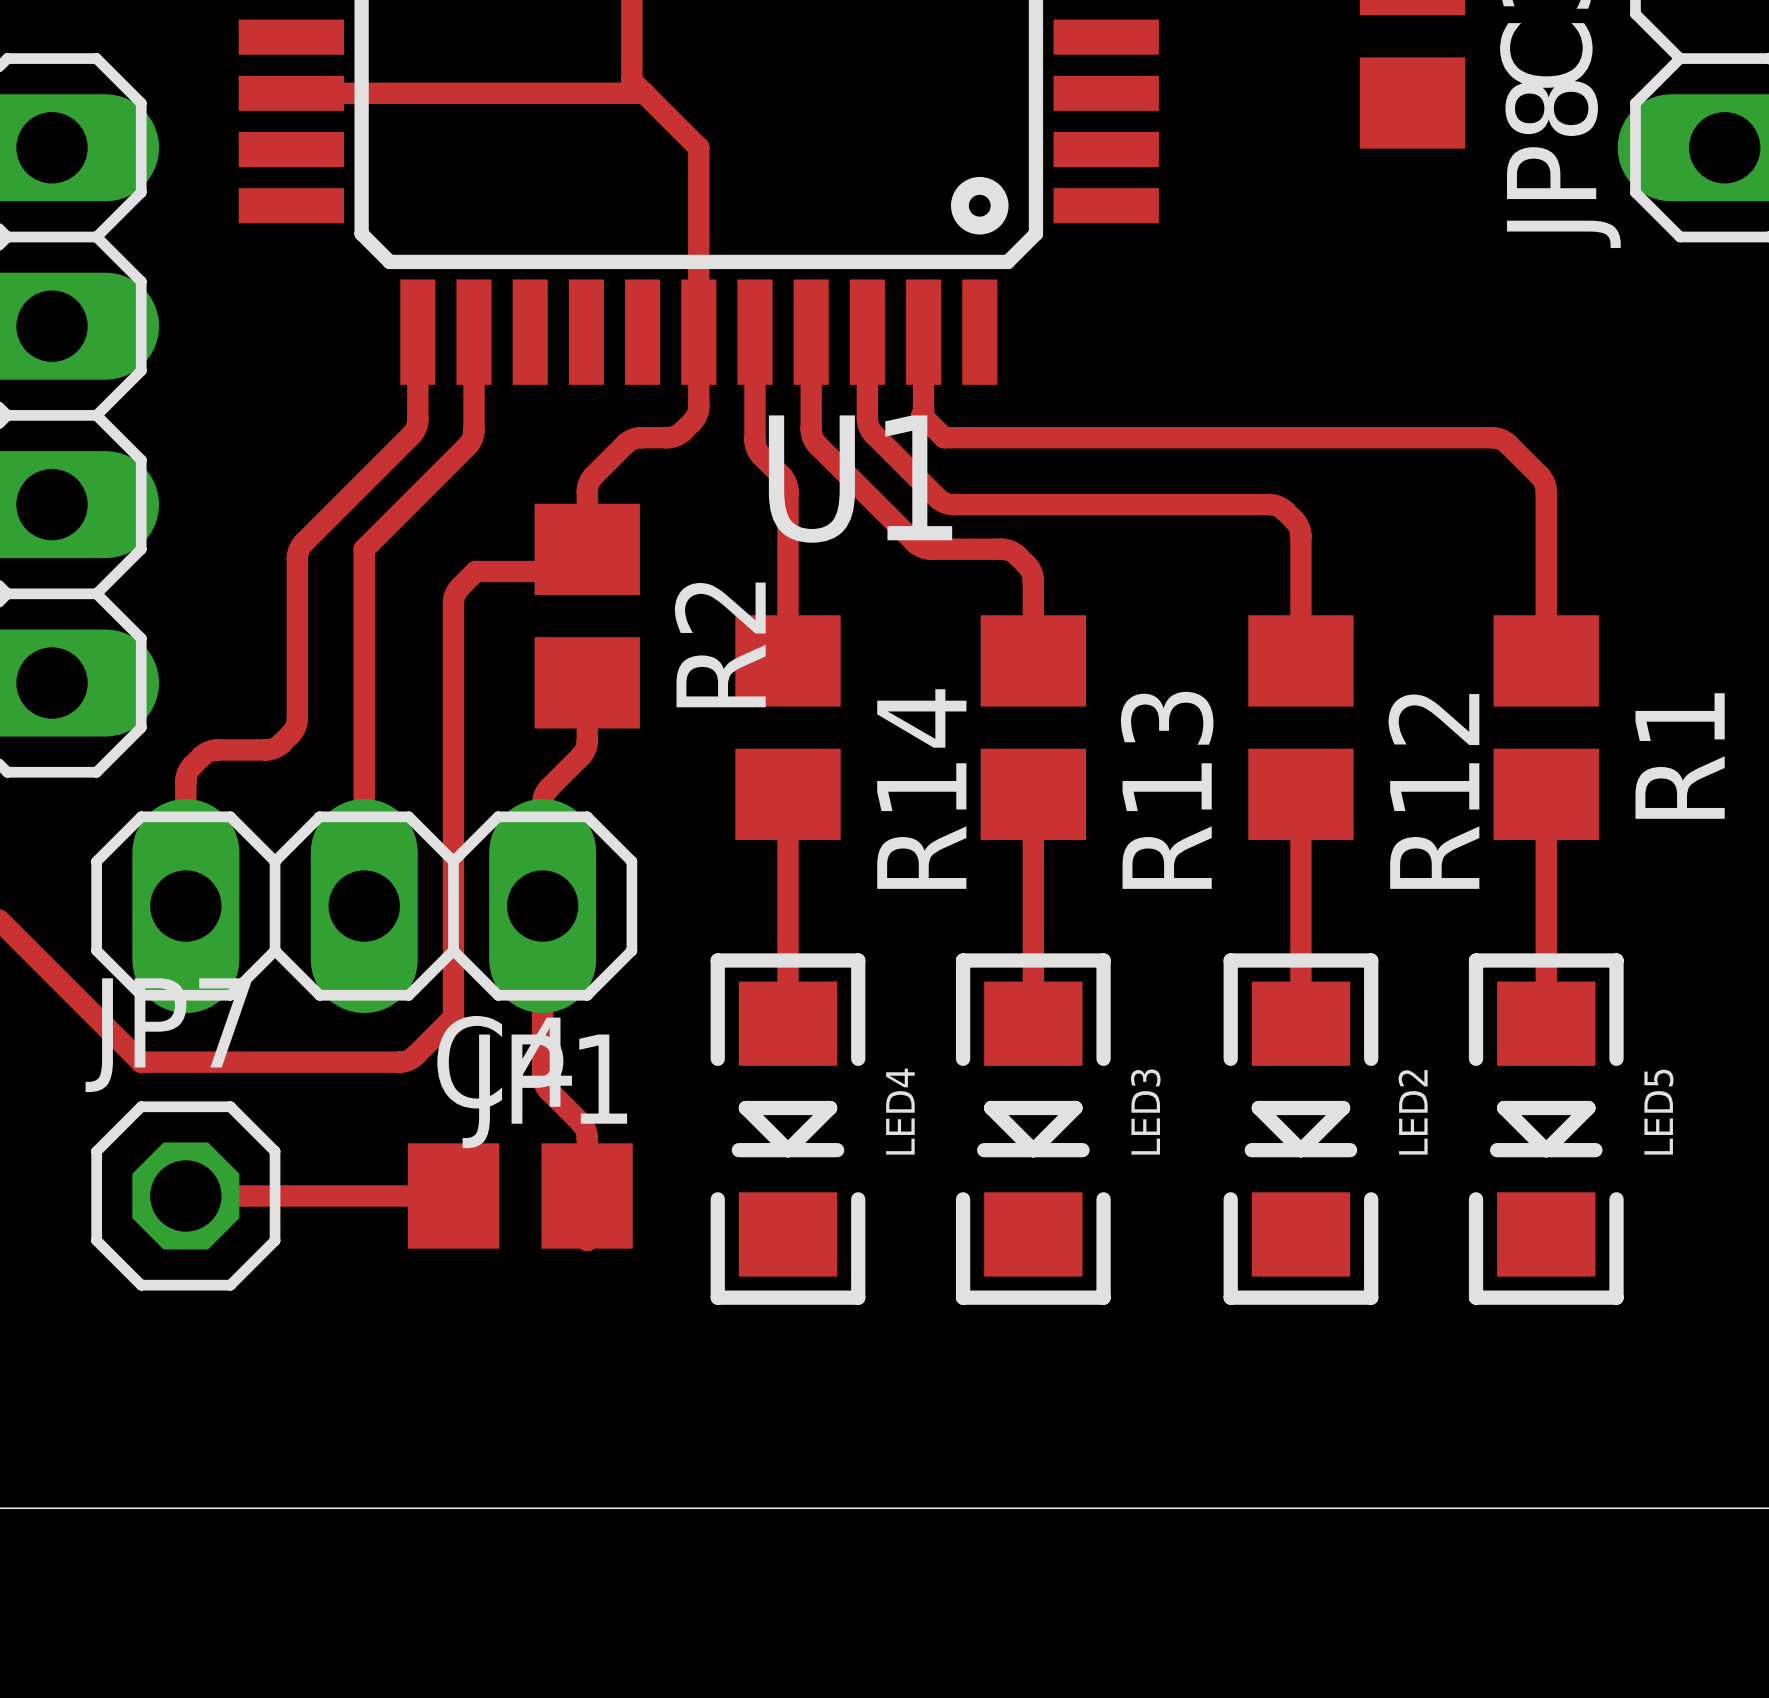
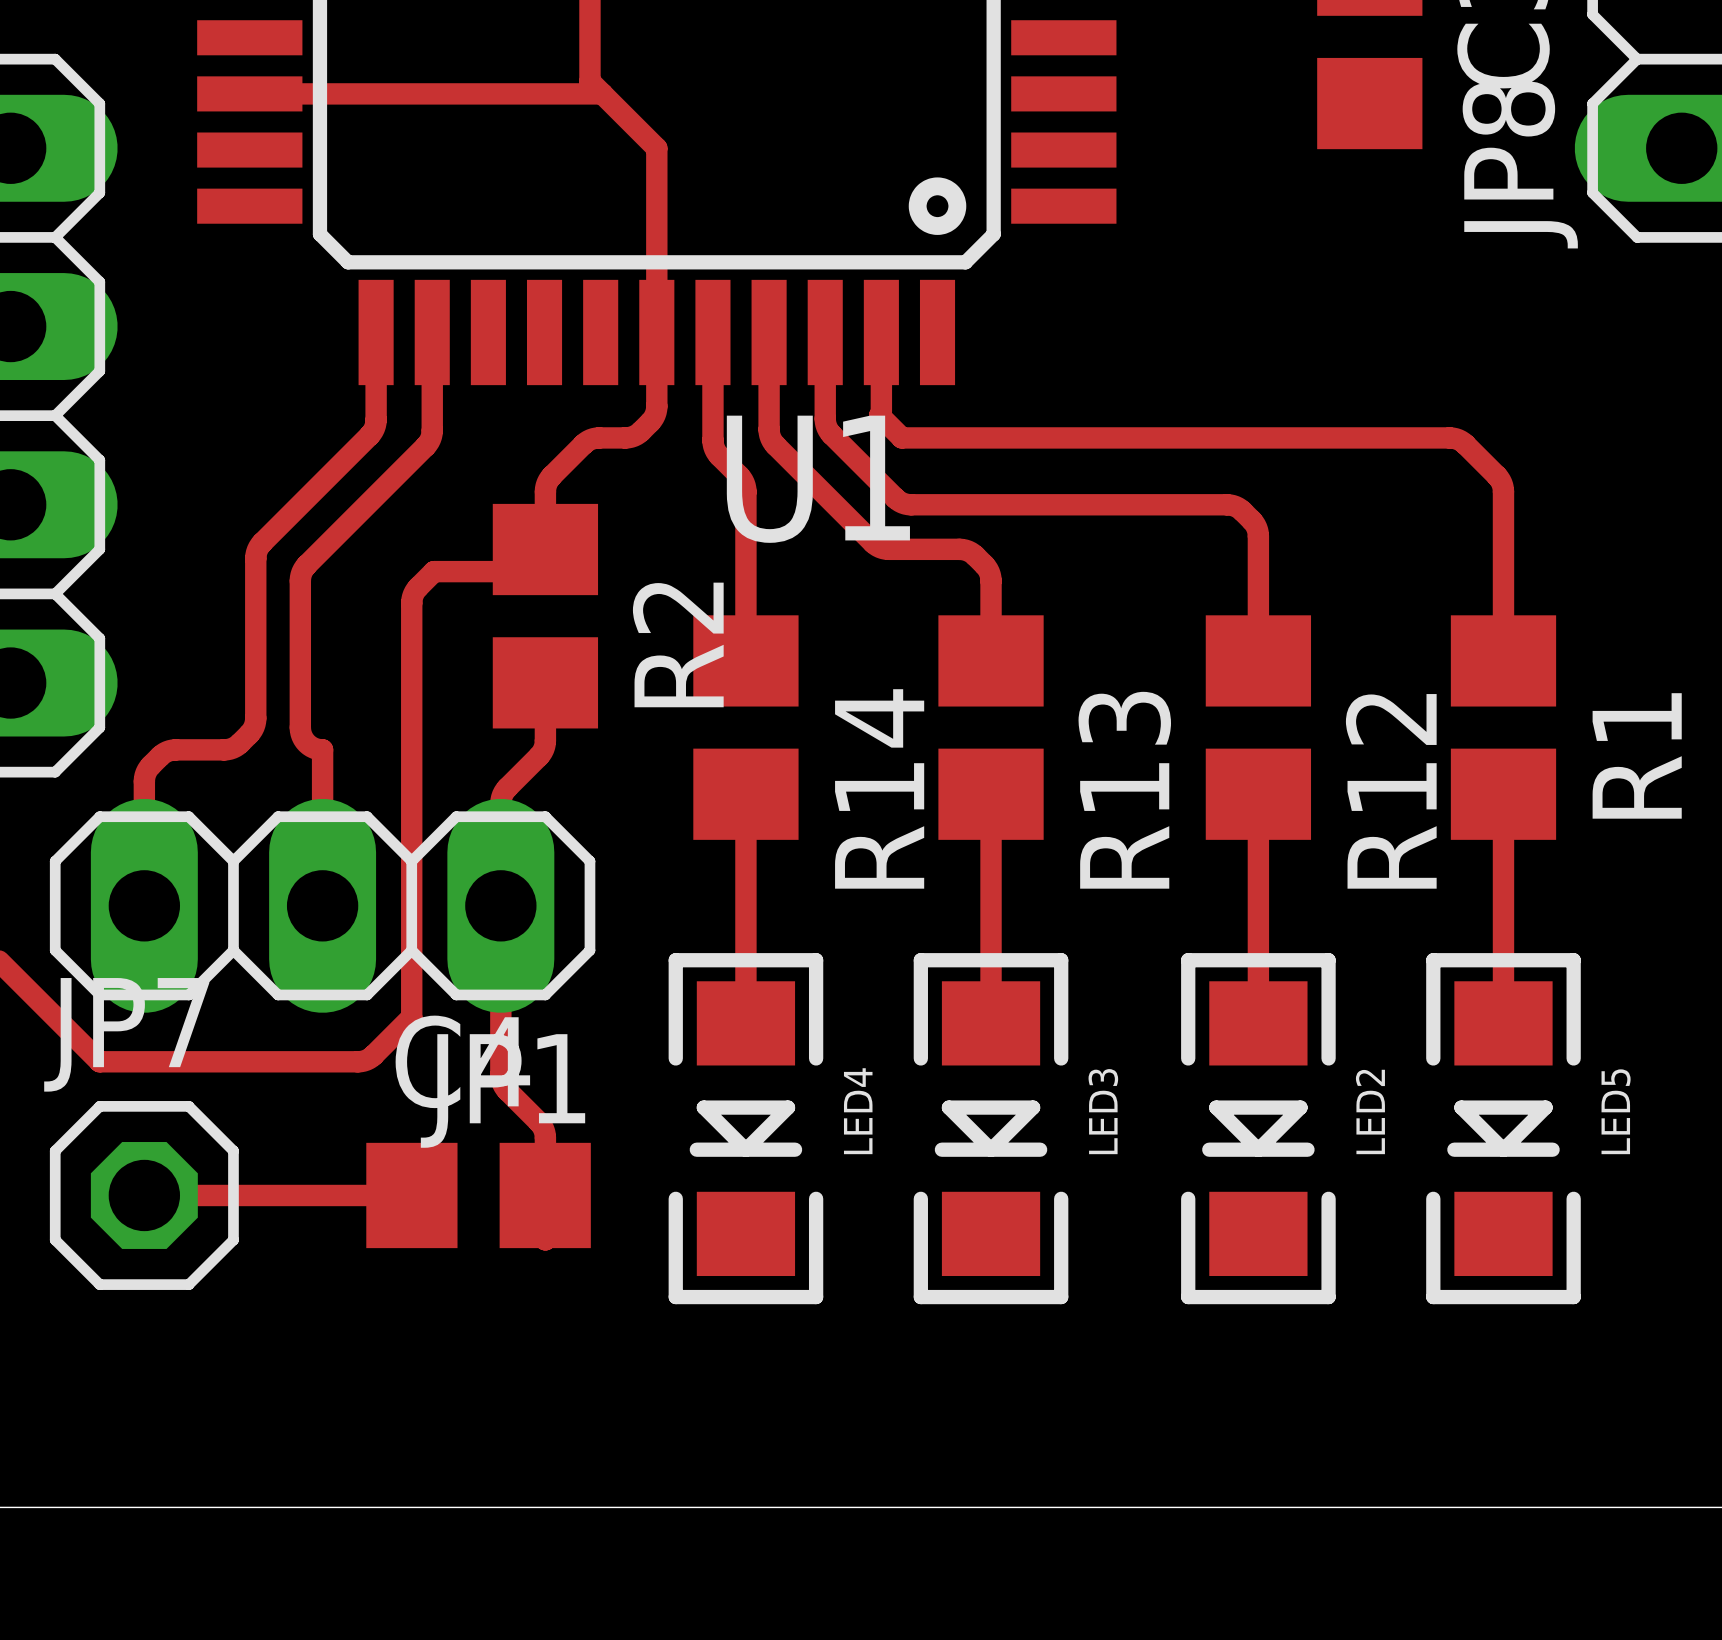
top track: (364, 549) (364, 749) -> (322, 549) (304, 567) (300, 580) (300, 730) (303, 738) (309, 745) (322, 749)

